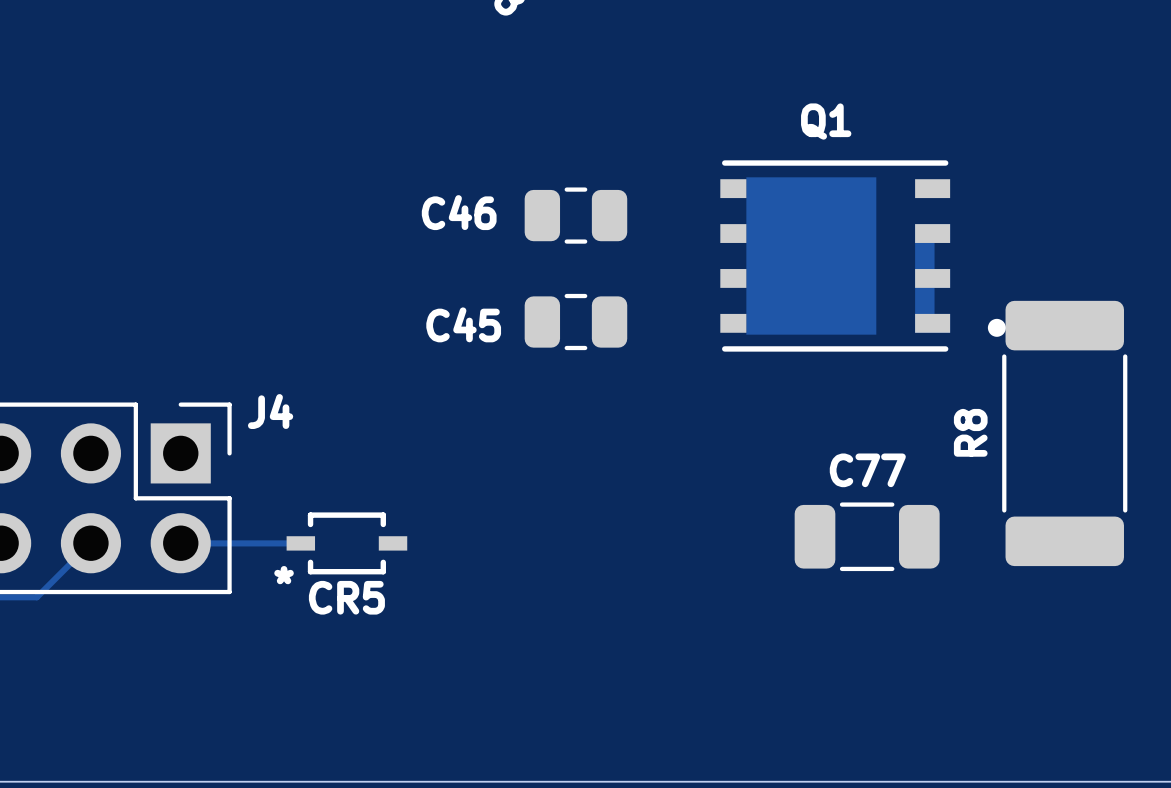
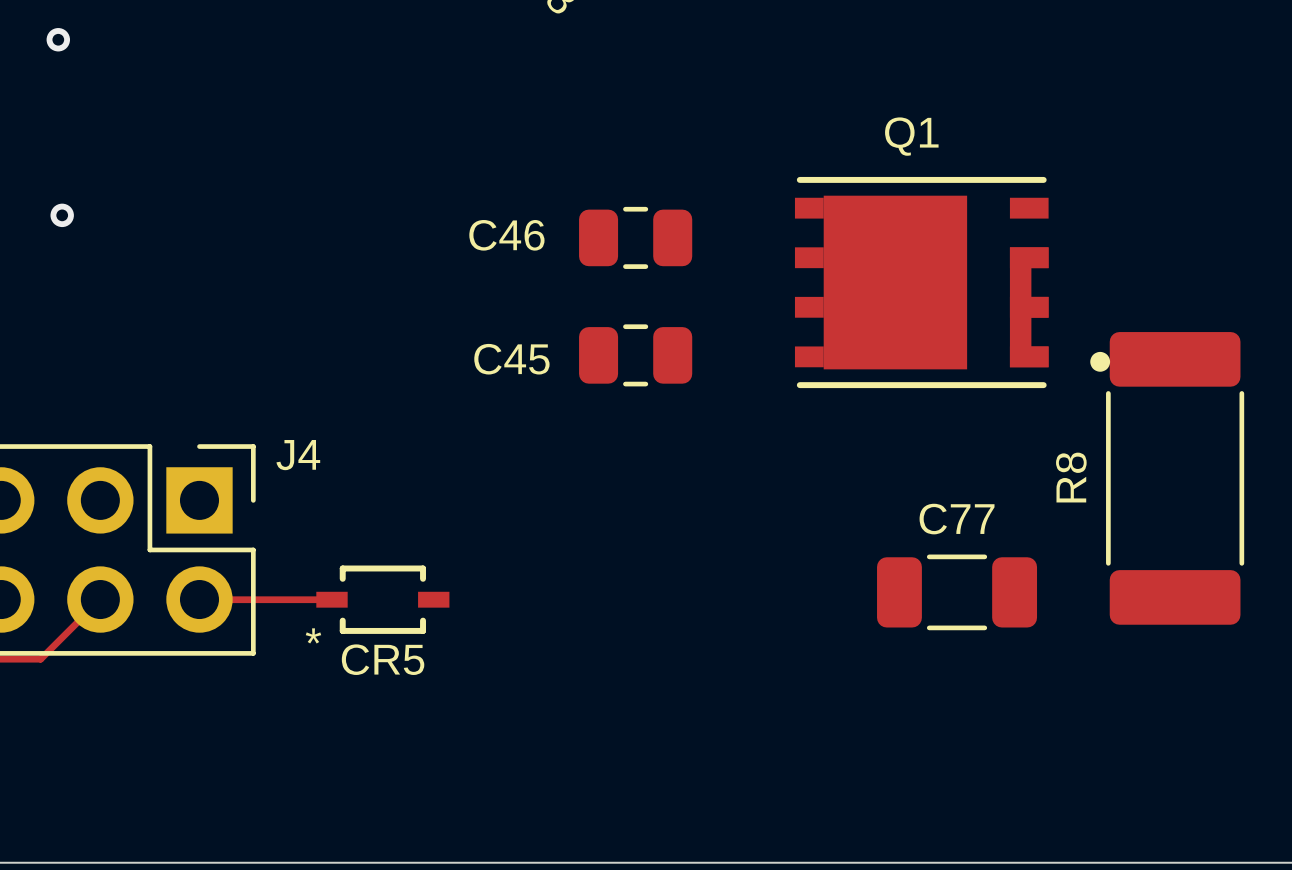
via: none -> (58, 39)
via: none -> (62, 215)

